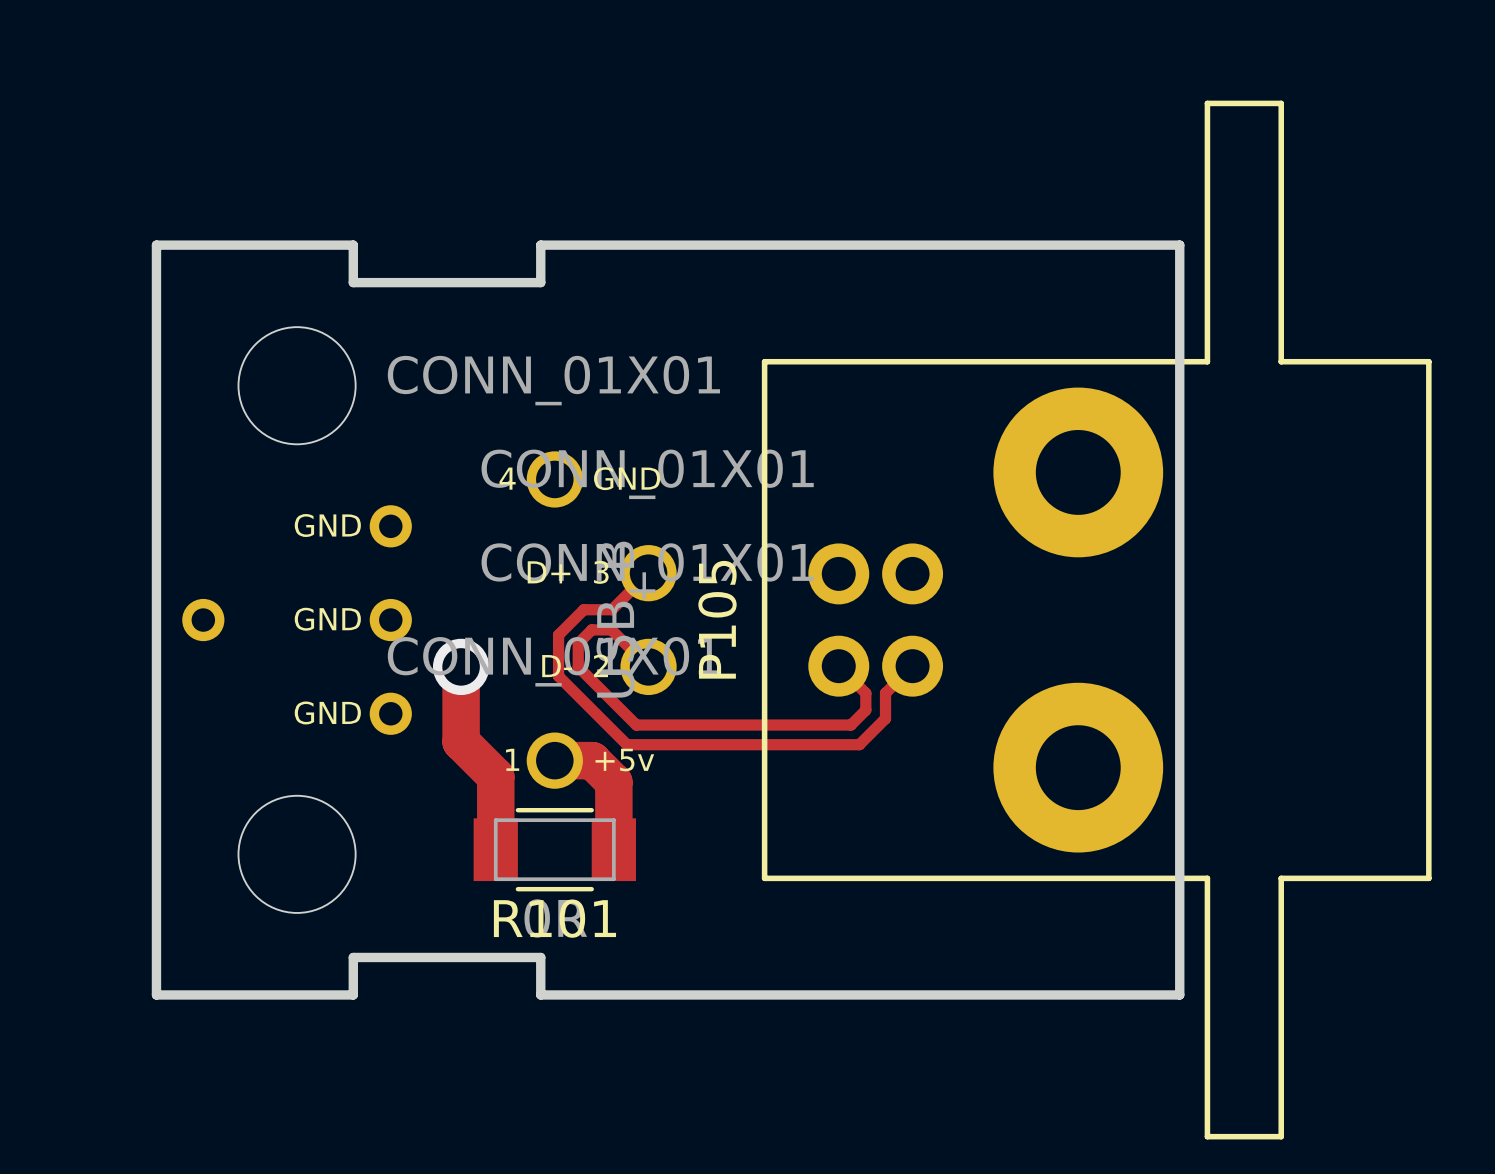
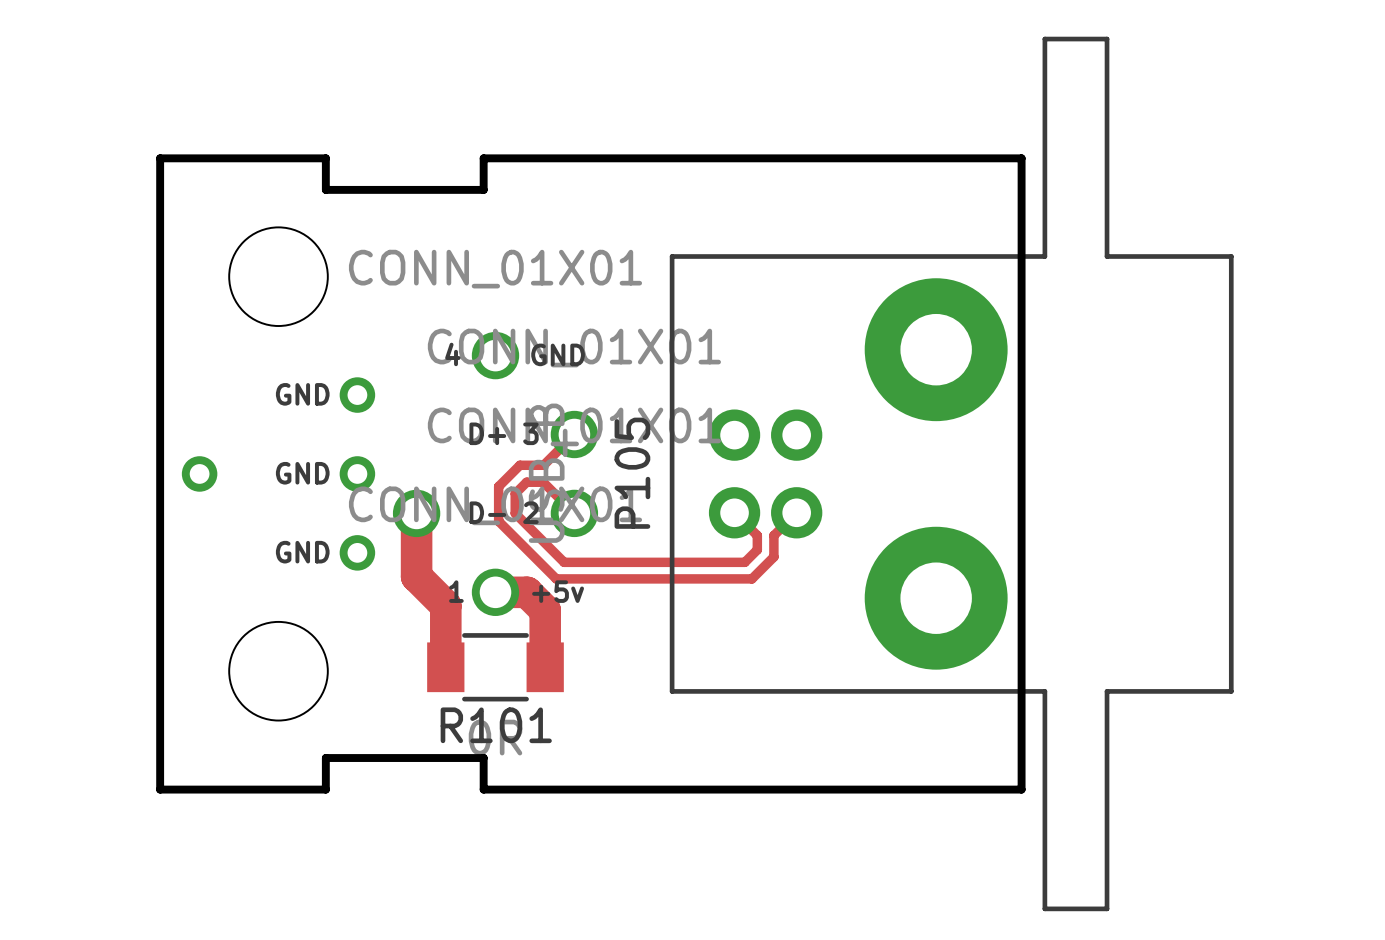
R101 footprint: [473, 807, 637, 892] -> [427, 633, 564, 702]

